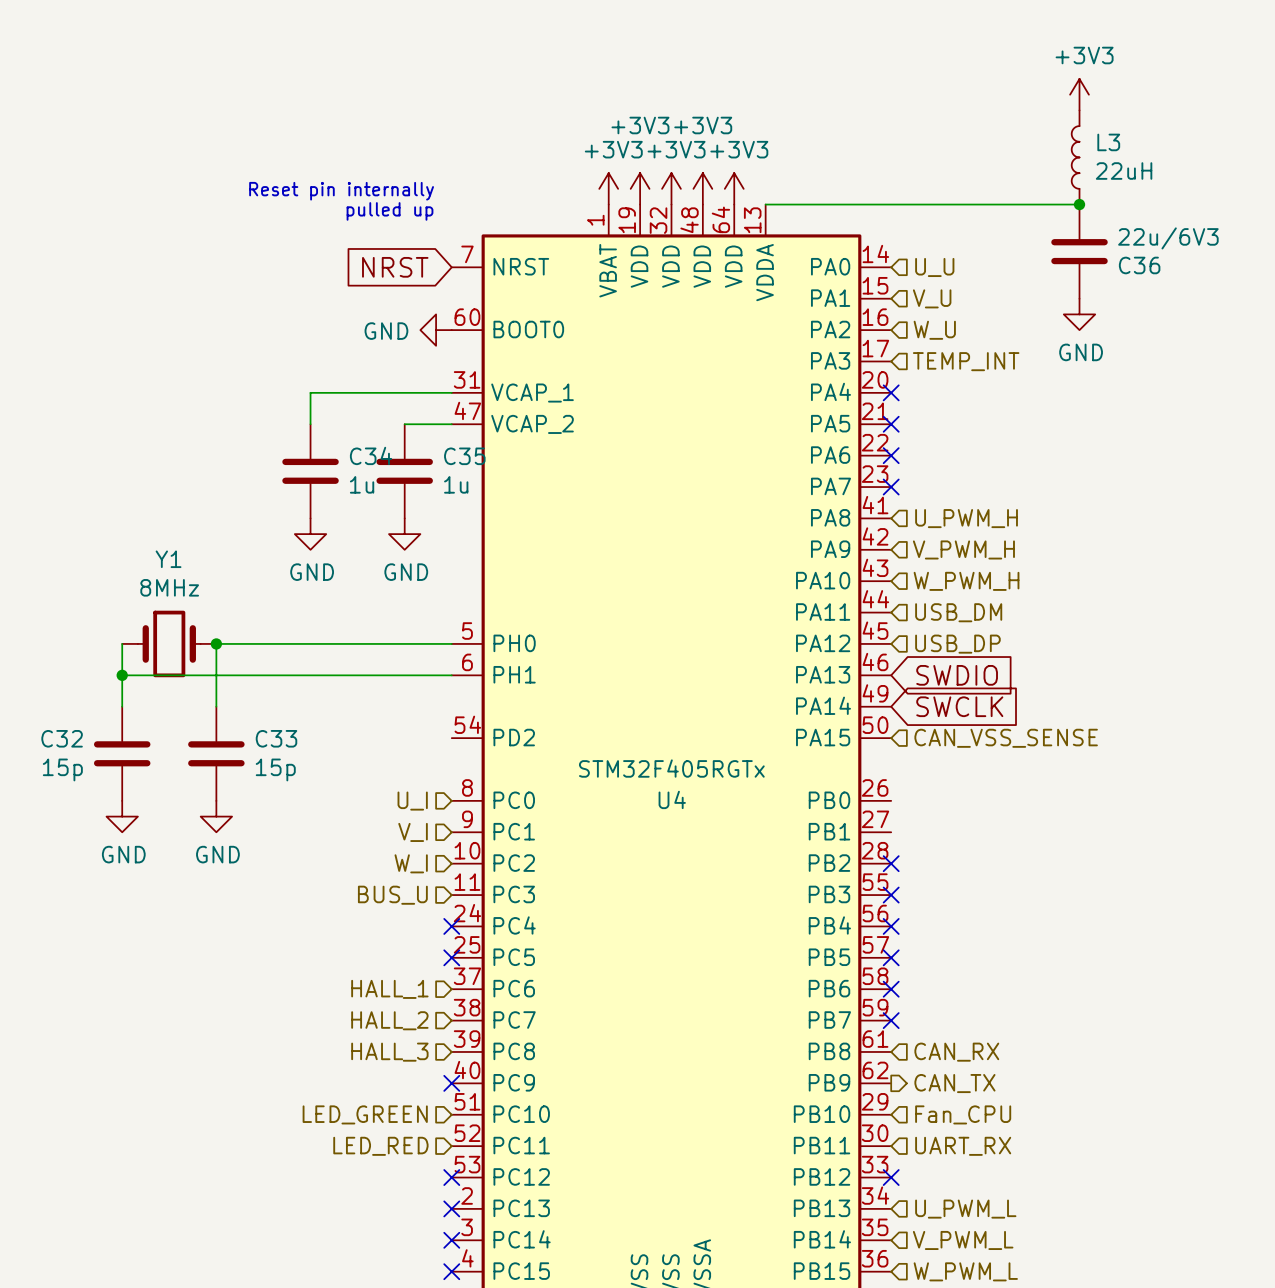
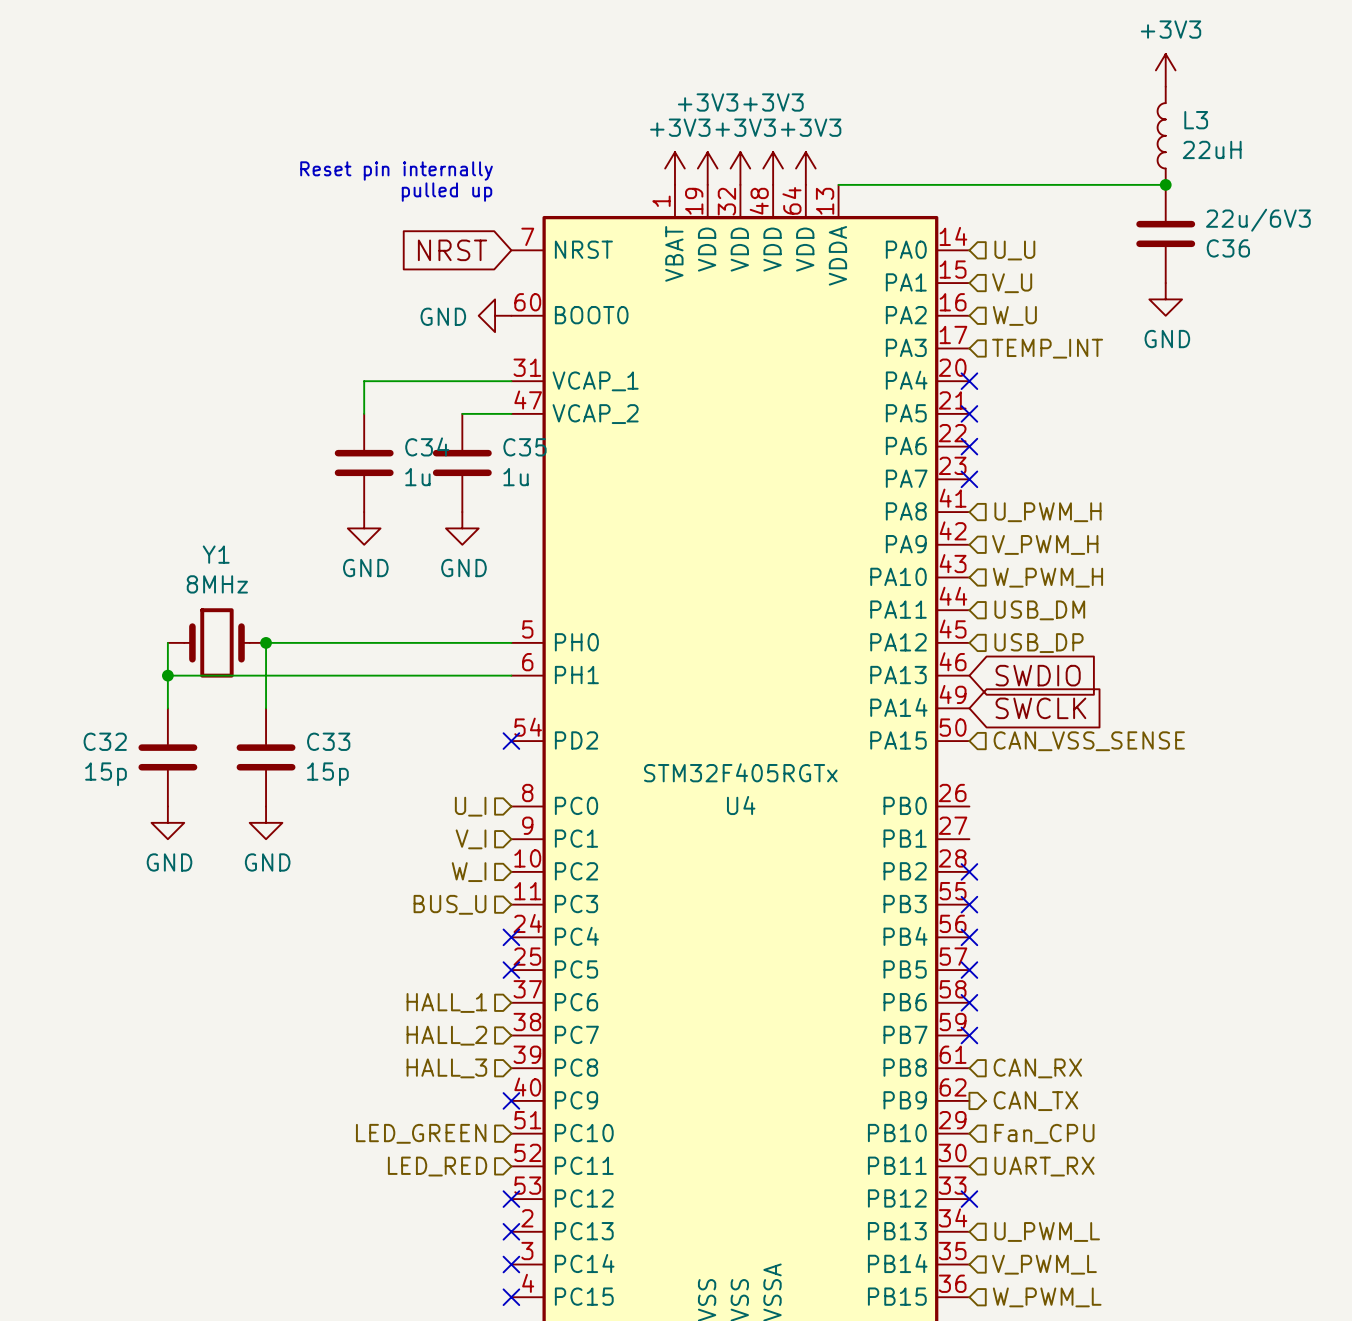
no-connect mark: none -> (511, 741)

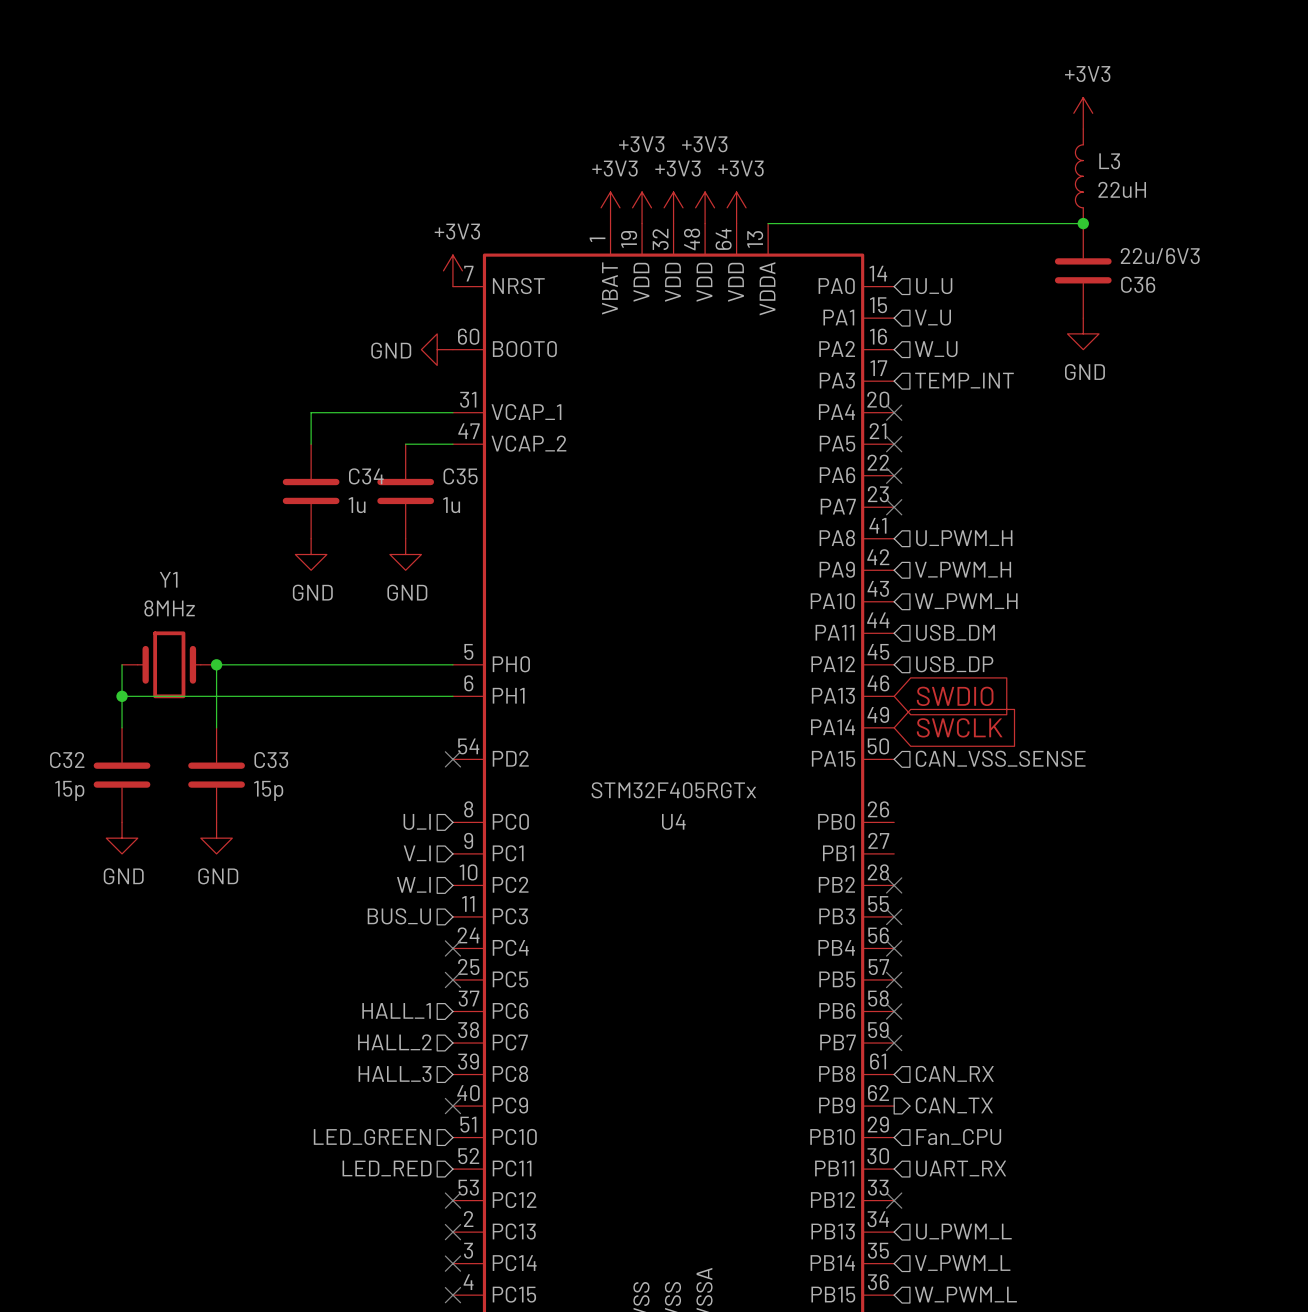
text: Reset pin internally (396, 171) -> none
text: pulled up (447, 192) -> none
power symbol: none -> +3V3 (452, 270)
global label: NRST (452, 250) -> none

